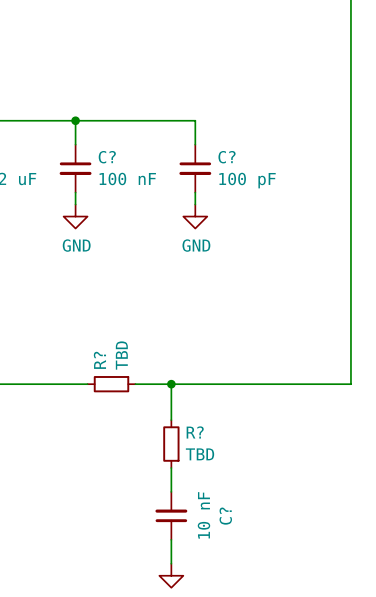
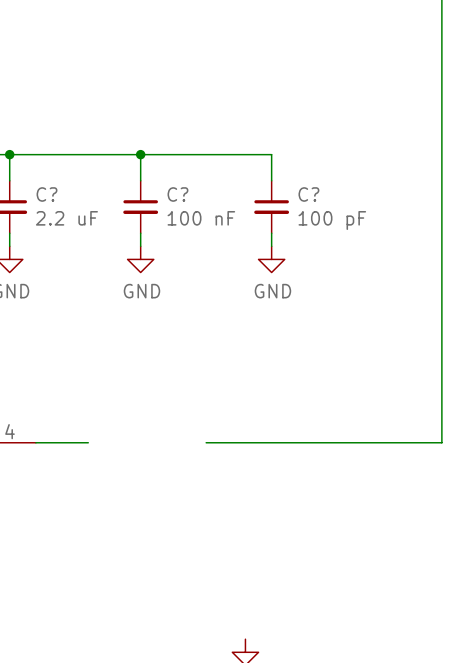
wire: (27, 384) (87, 384) -> none
R?: TBD (111, 384) -> none
wire: (171, 384) (171, 420) -> none
junction: (171, 384) -> none
R?: TBD (171, 444) -> none
wire: (171, 467) (171, 491) -> none
C?: 10 nF (171, 515) -> none
wire: (171, 539) (171, 563) -> none

